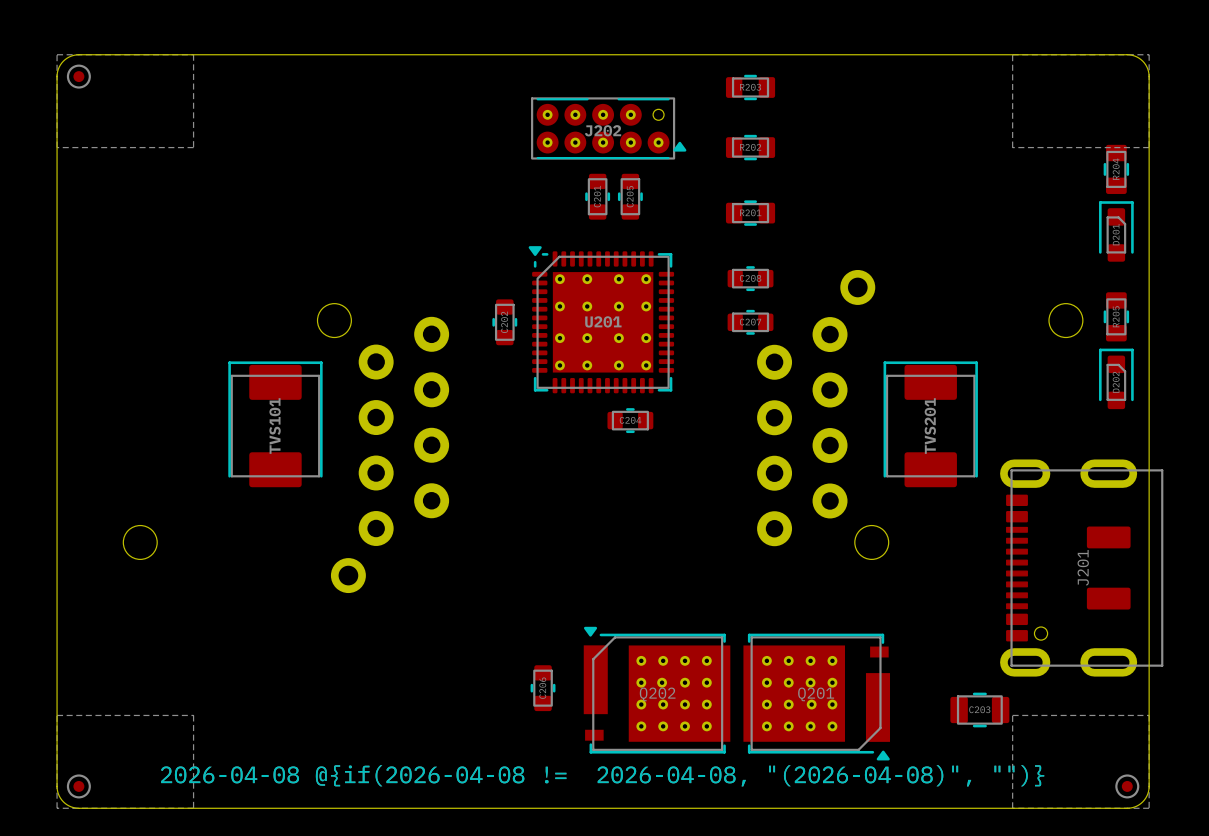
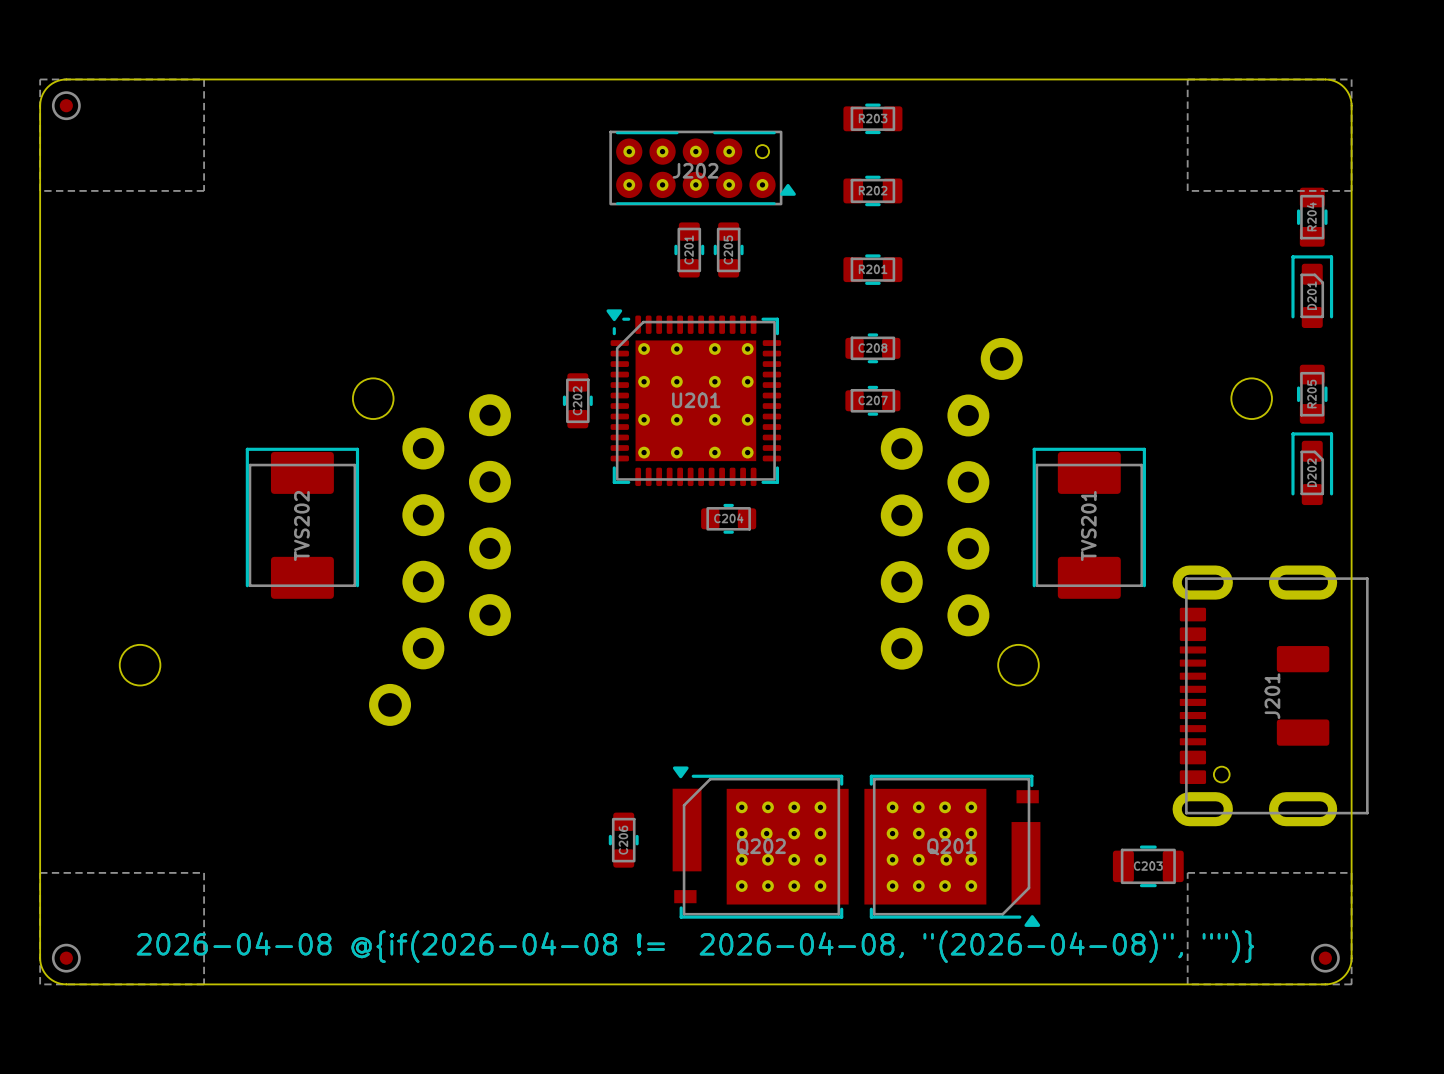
TVS101 name: TVS101 (275, 426) -> TVS202 (301, 526)

